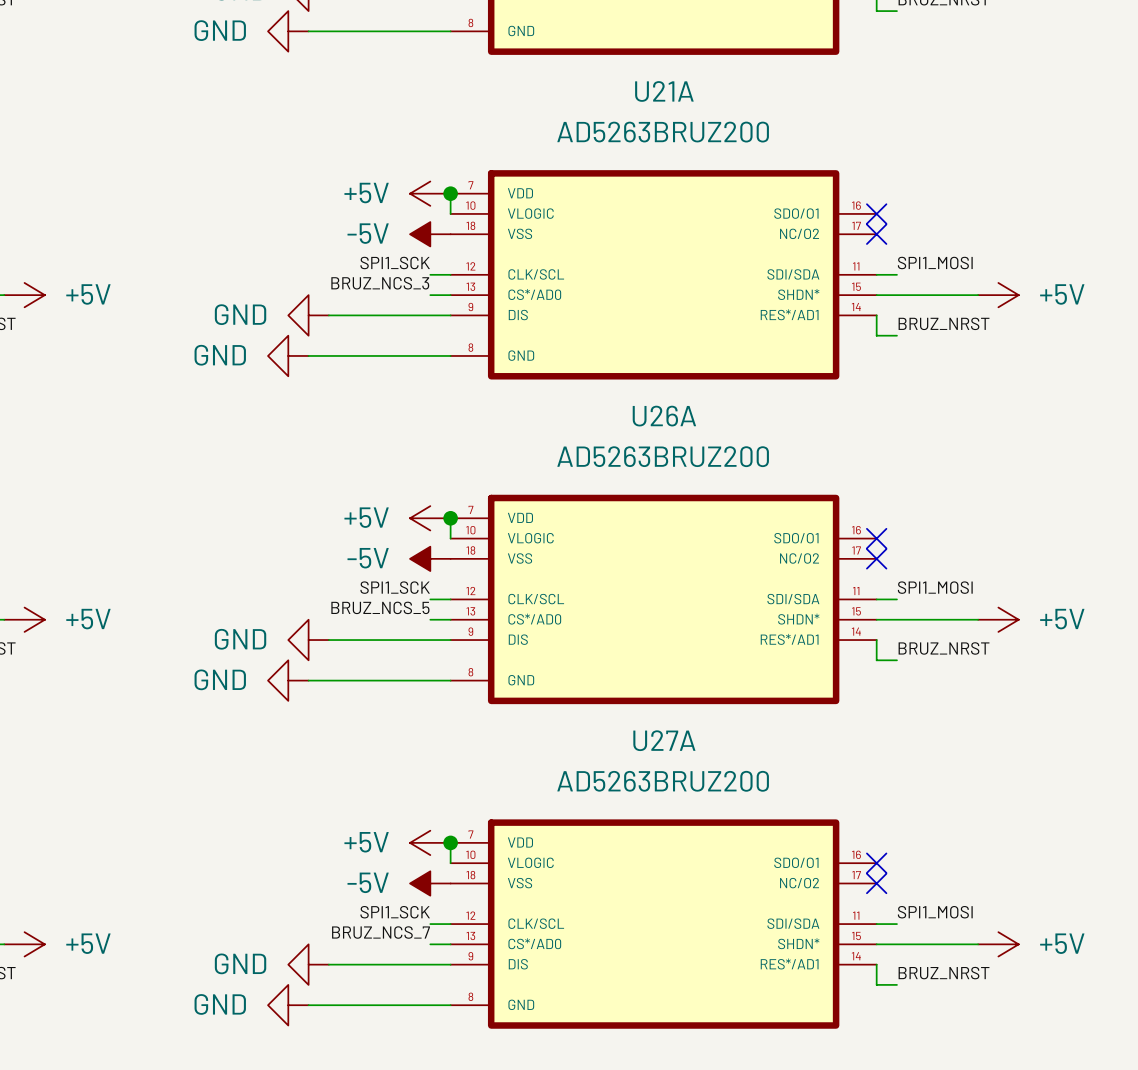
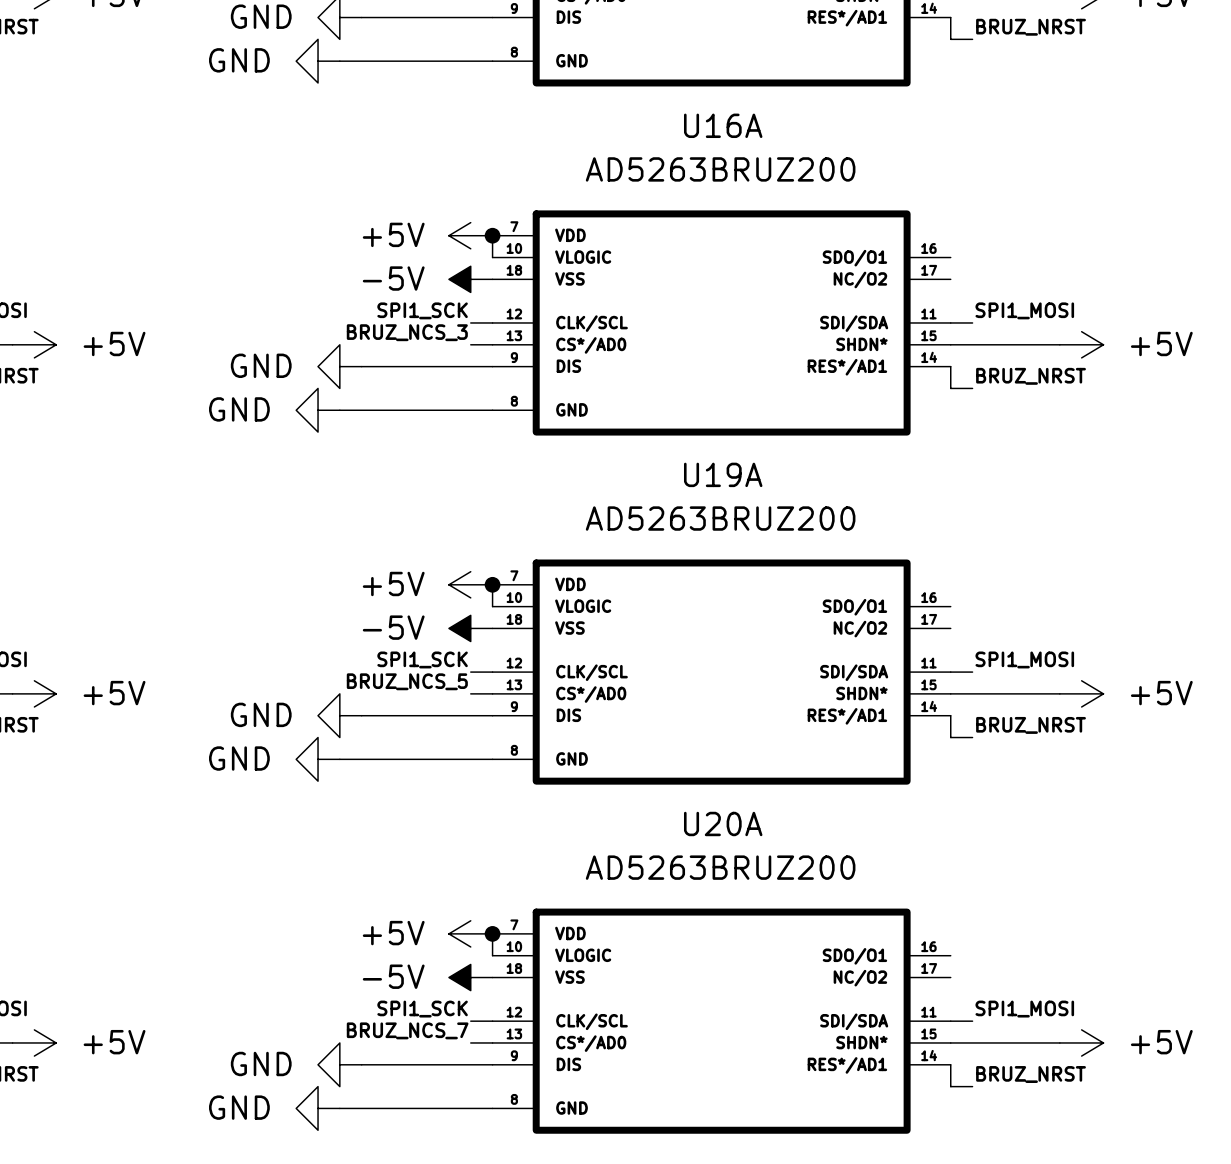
U21A name: U21A (664, 91) -> U16A (723, 125)
no-connect mark: (876, 213) -> none
no-connect mark: (876, 234) -> none
U26A name: U26A (664, 416) -> U19A (723, 474)
no-connect mark: (876, 538) -> none
no-connect mark: (876, 558) -> none
U27A name: U27A (664, 740) -> U20A (723, 823)
no-connect mark: (876, 863) -> none
no-connect mark: (876, 883) -> none

